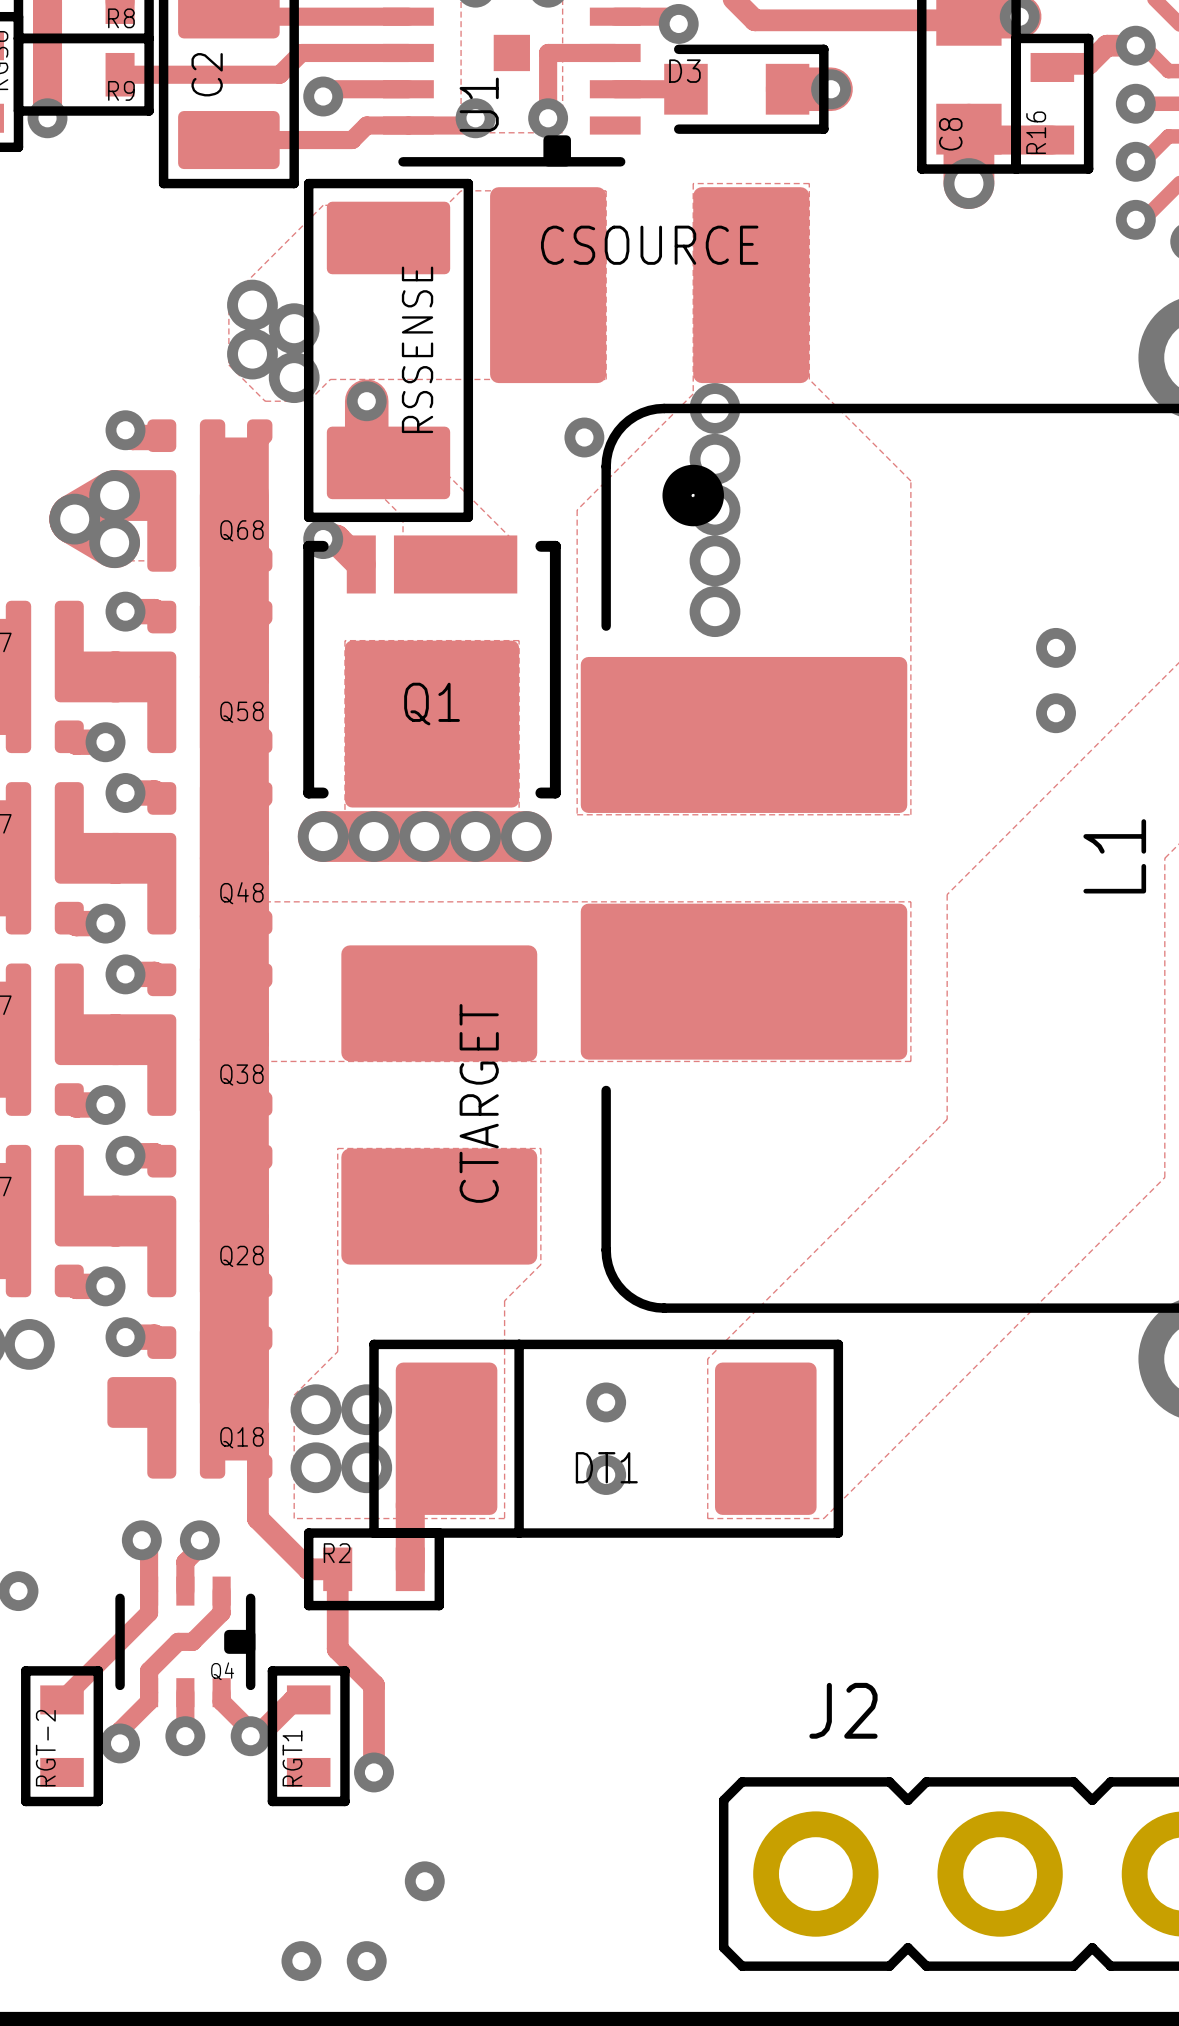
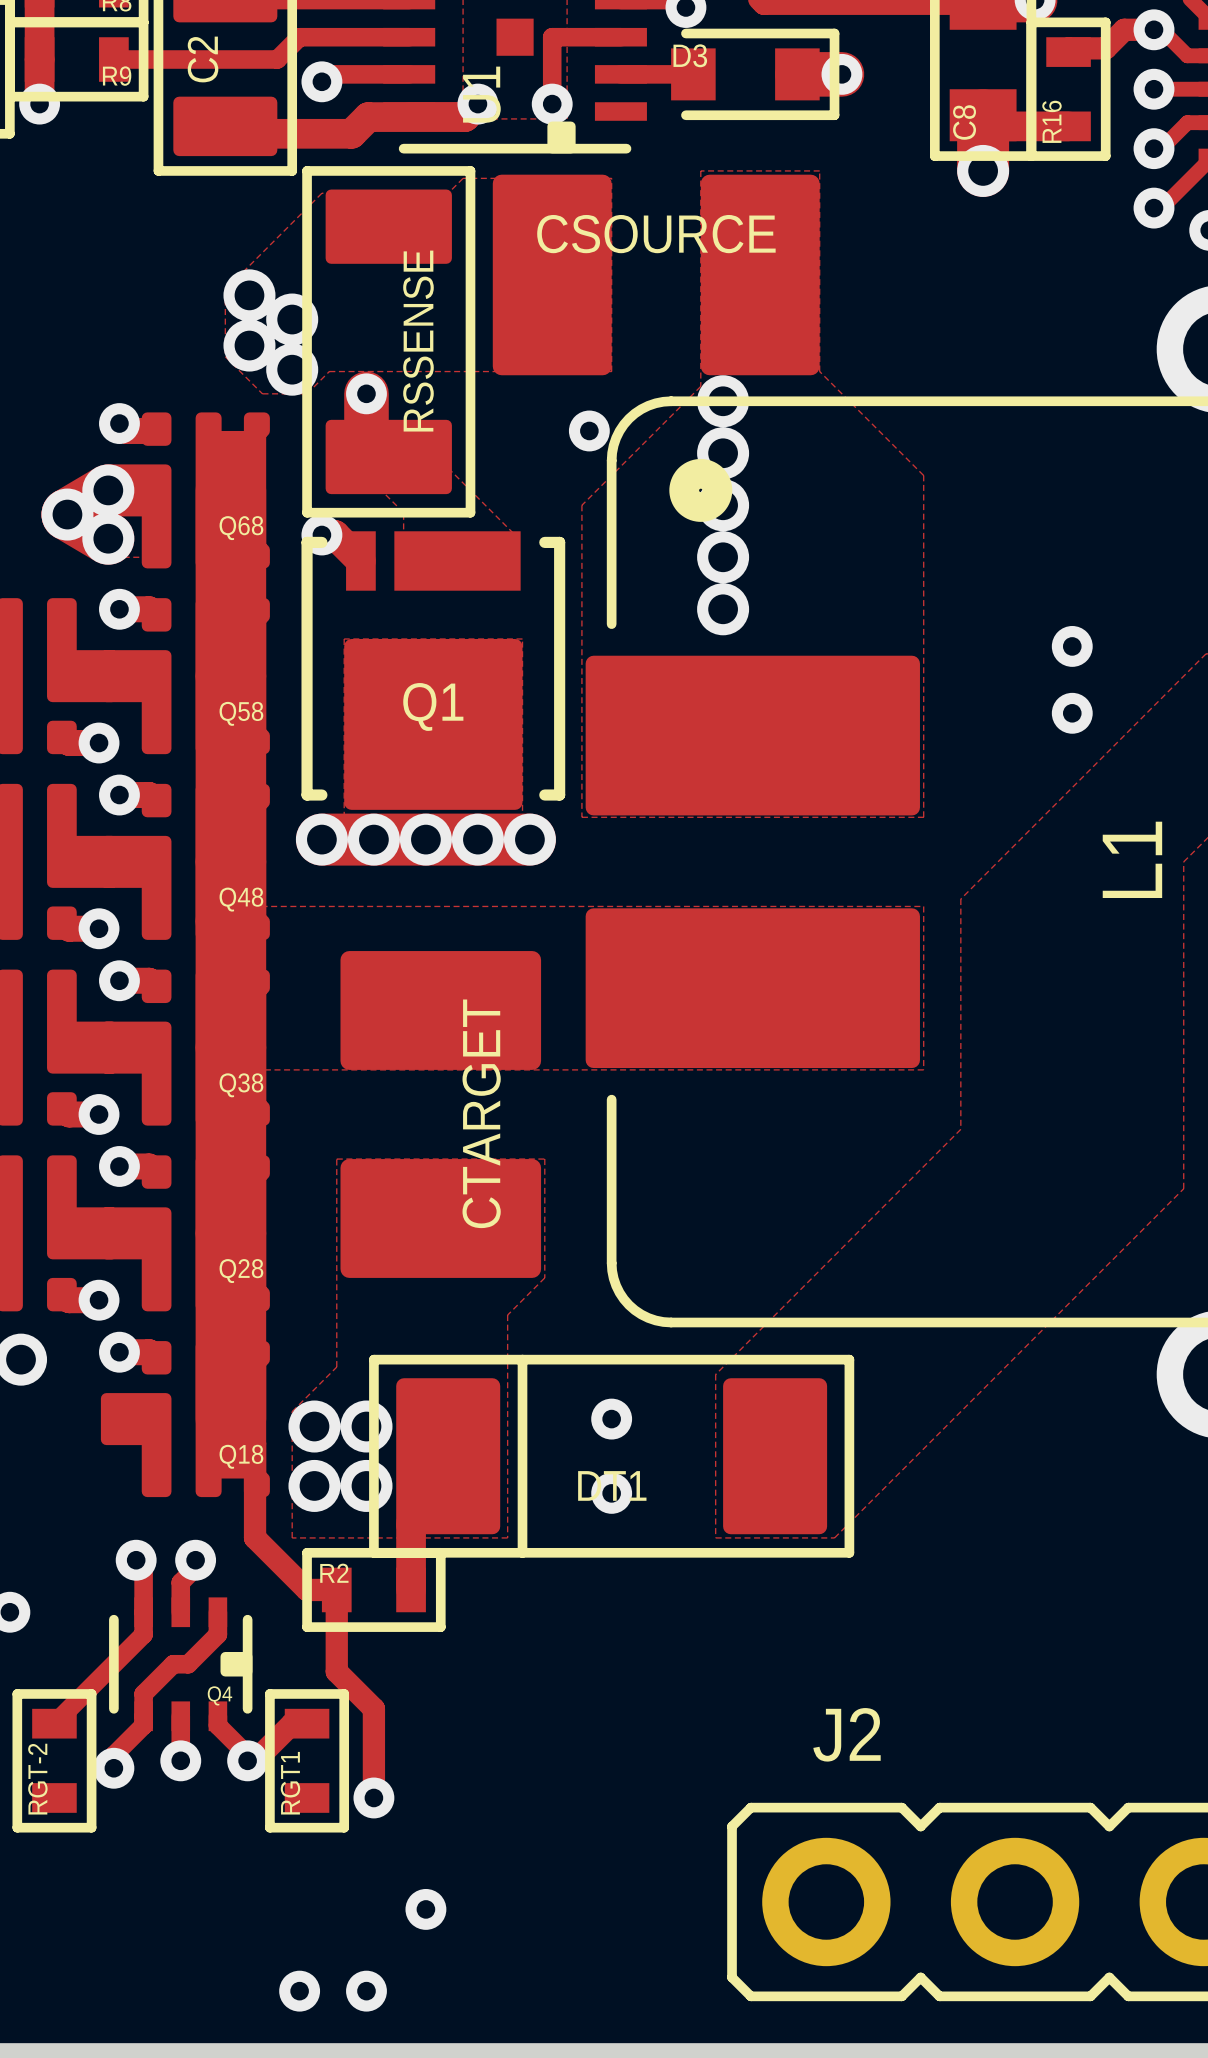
track: (408, 125) (366, 125) (352, 140) (228, 140) -> (477, 104) (464, 117) (368, 117) (351, 133) (232, 133) (225, 126)

